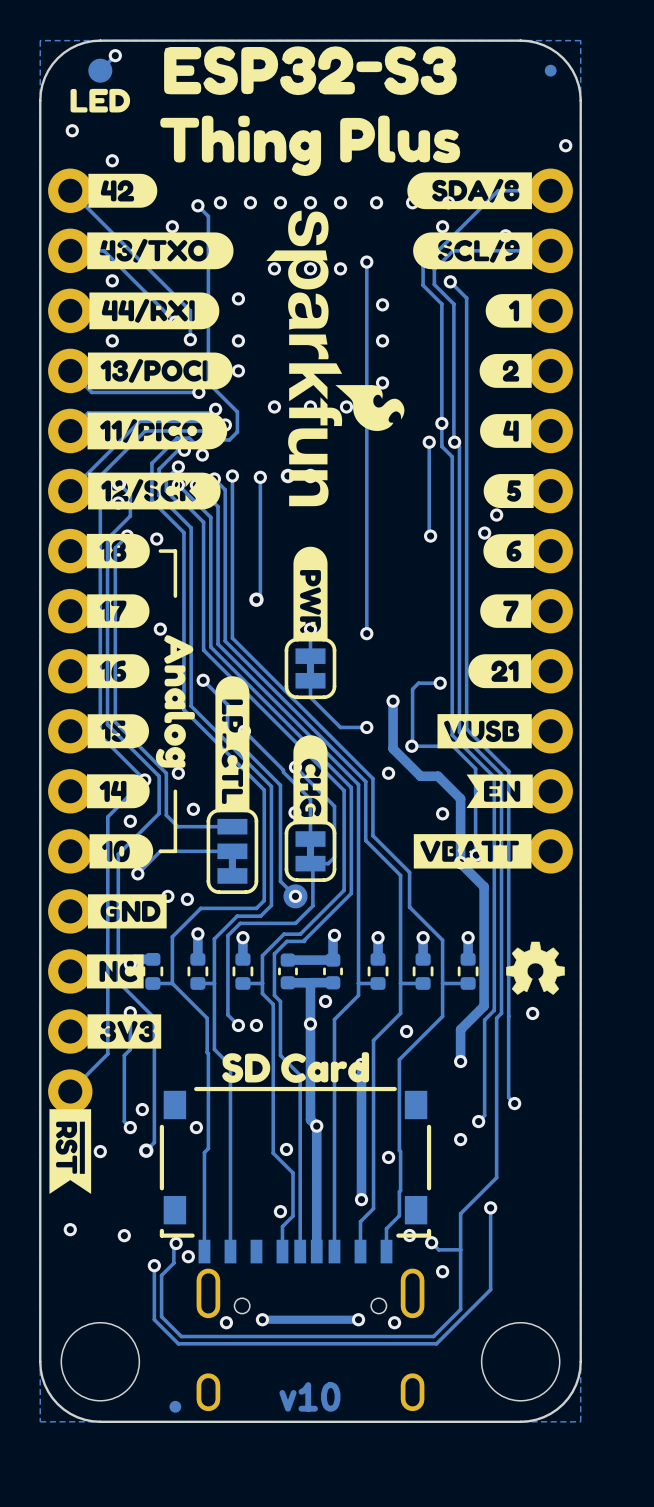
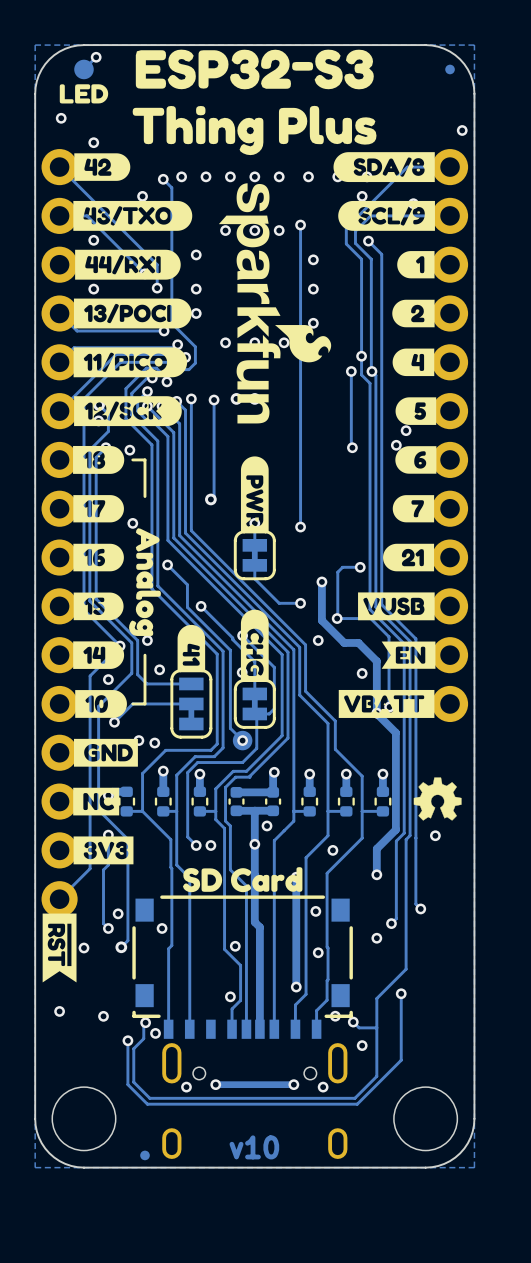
drawing: [215, 676, 250, 811] -> none
drawing: none -> [177, 624, 206, 671]
via position: (316, 1126) -> (315, 911)

